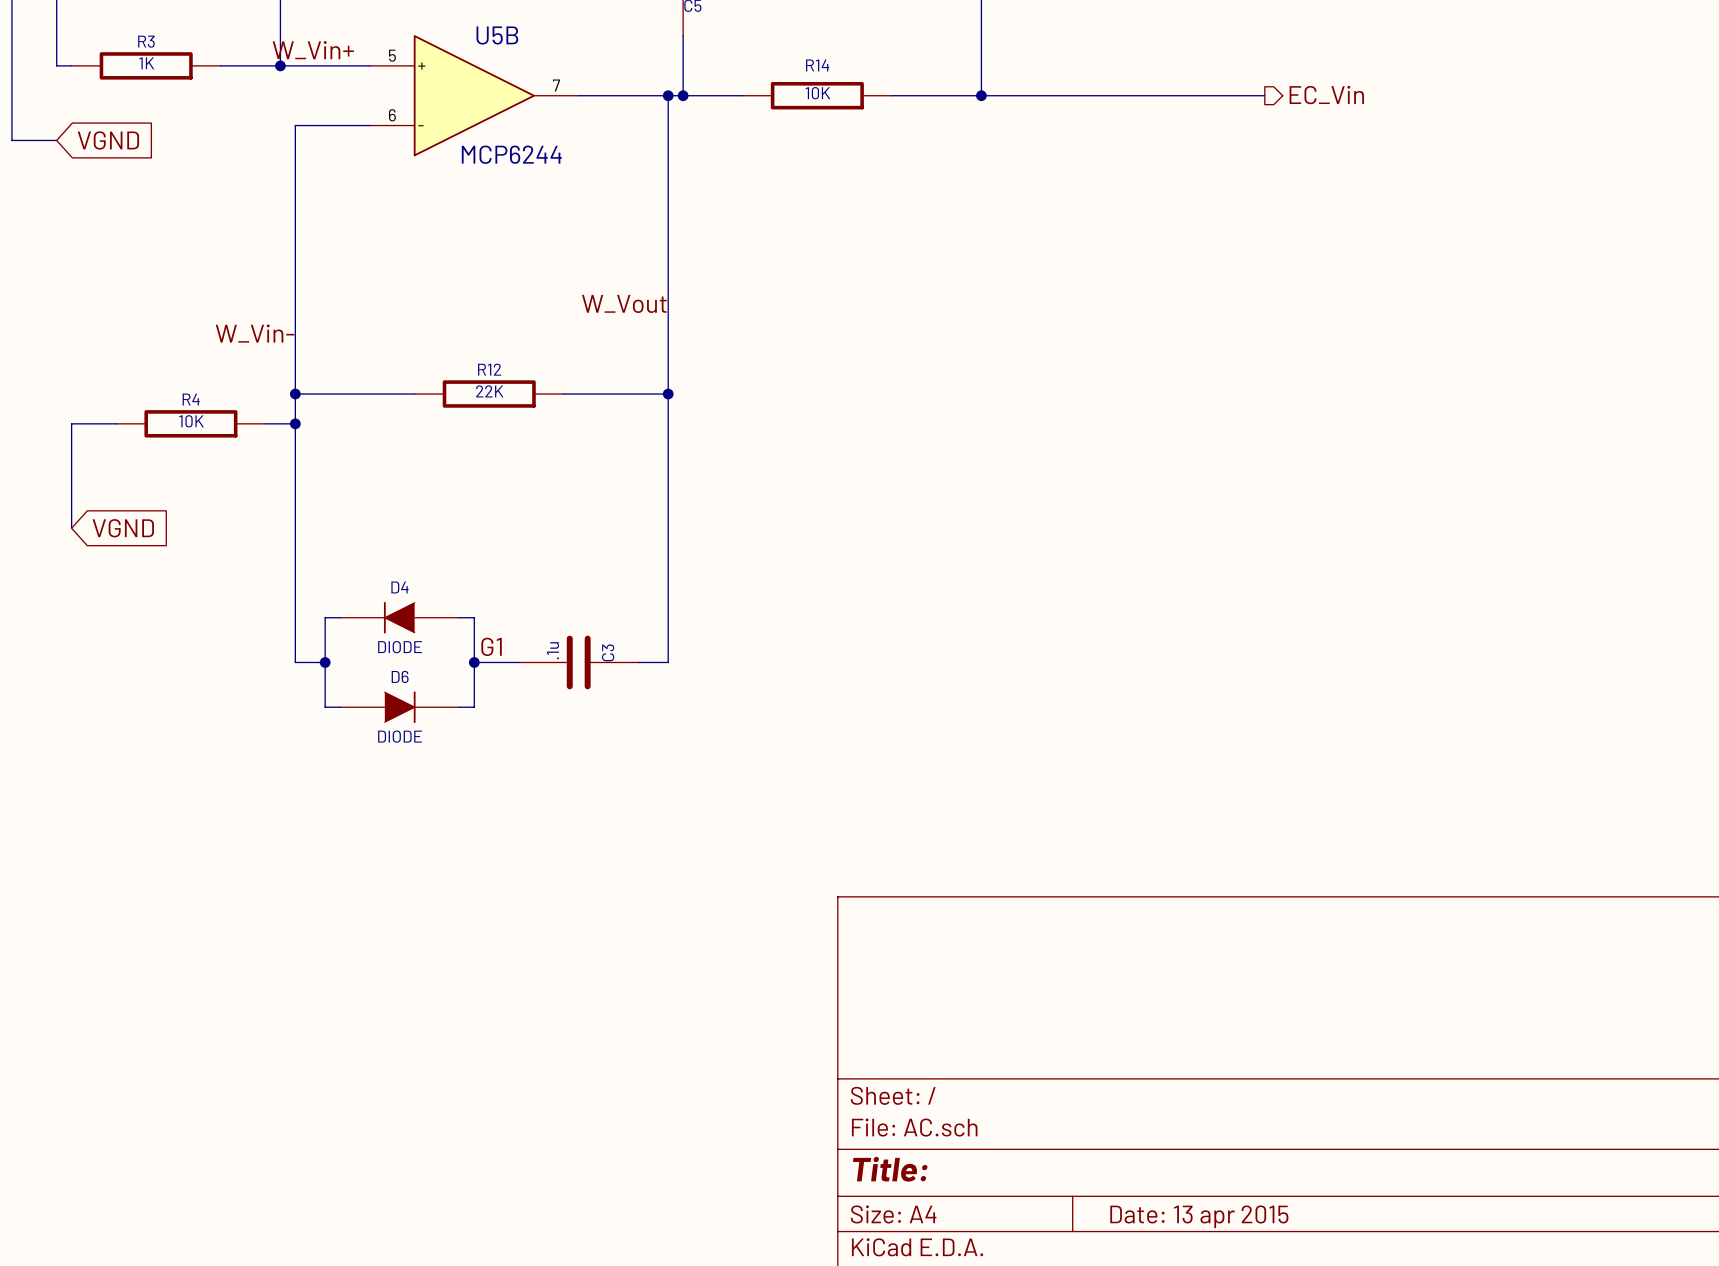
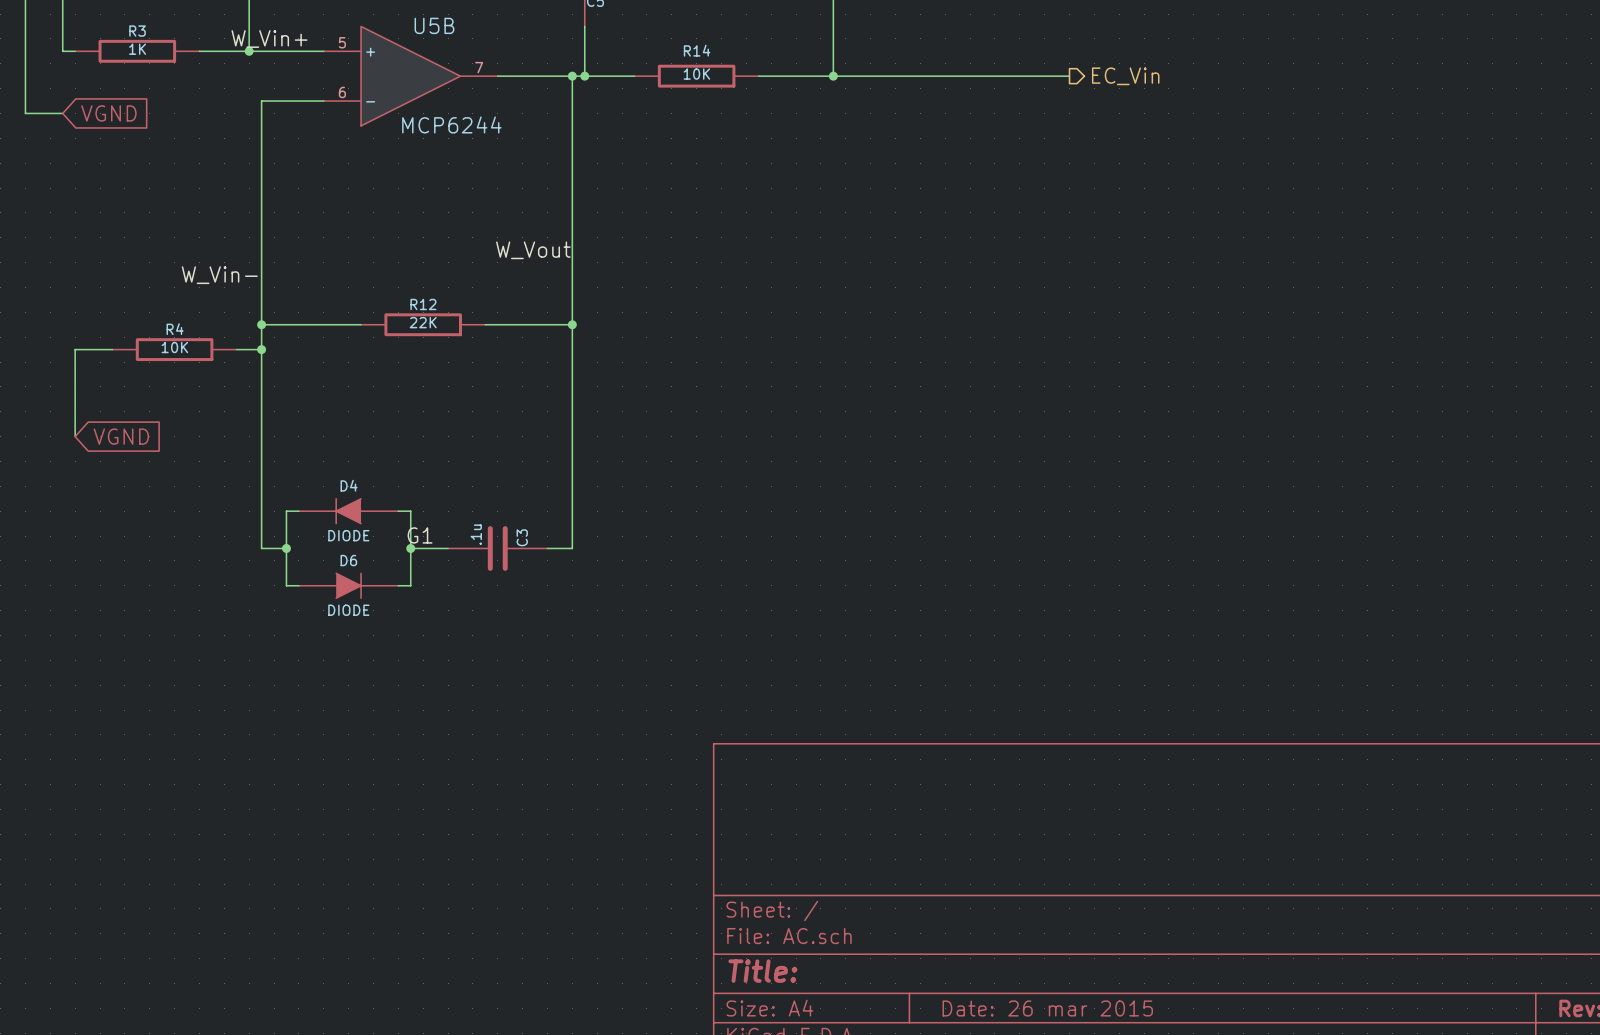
title block: Date: 13 apr 2015 (1199, 1216) -> Date: 26 mar 2015 (1047, 1008)

